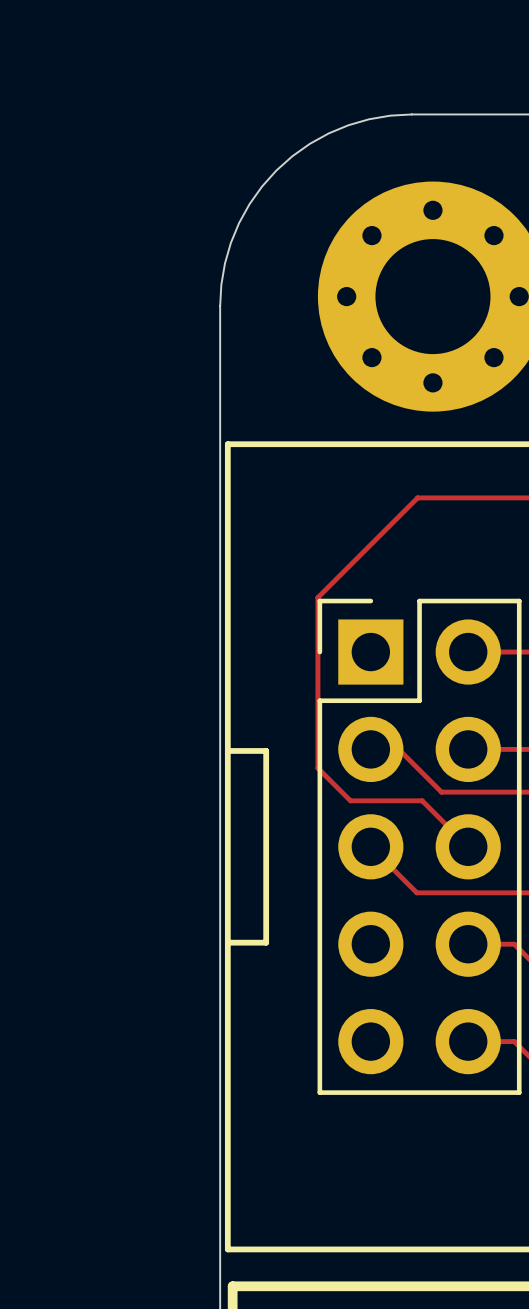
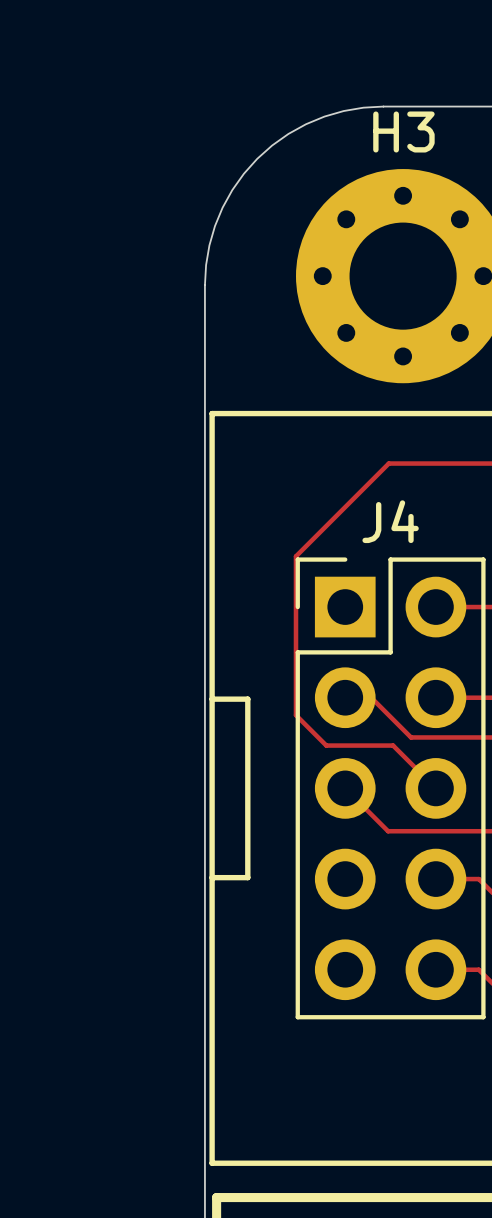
H3 name: none -> H3 (403, 131)
J4 name: none -> J4 (390, 521)

